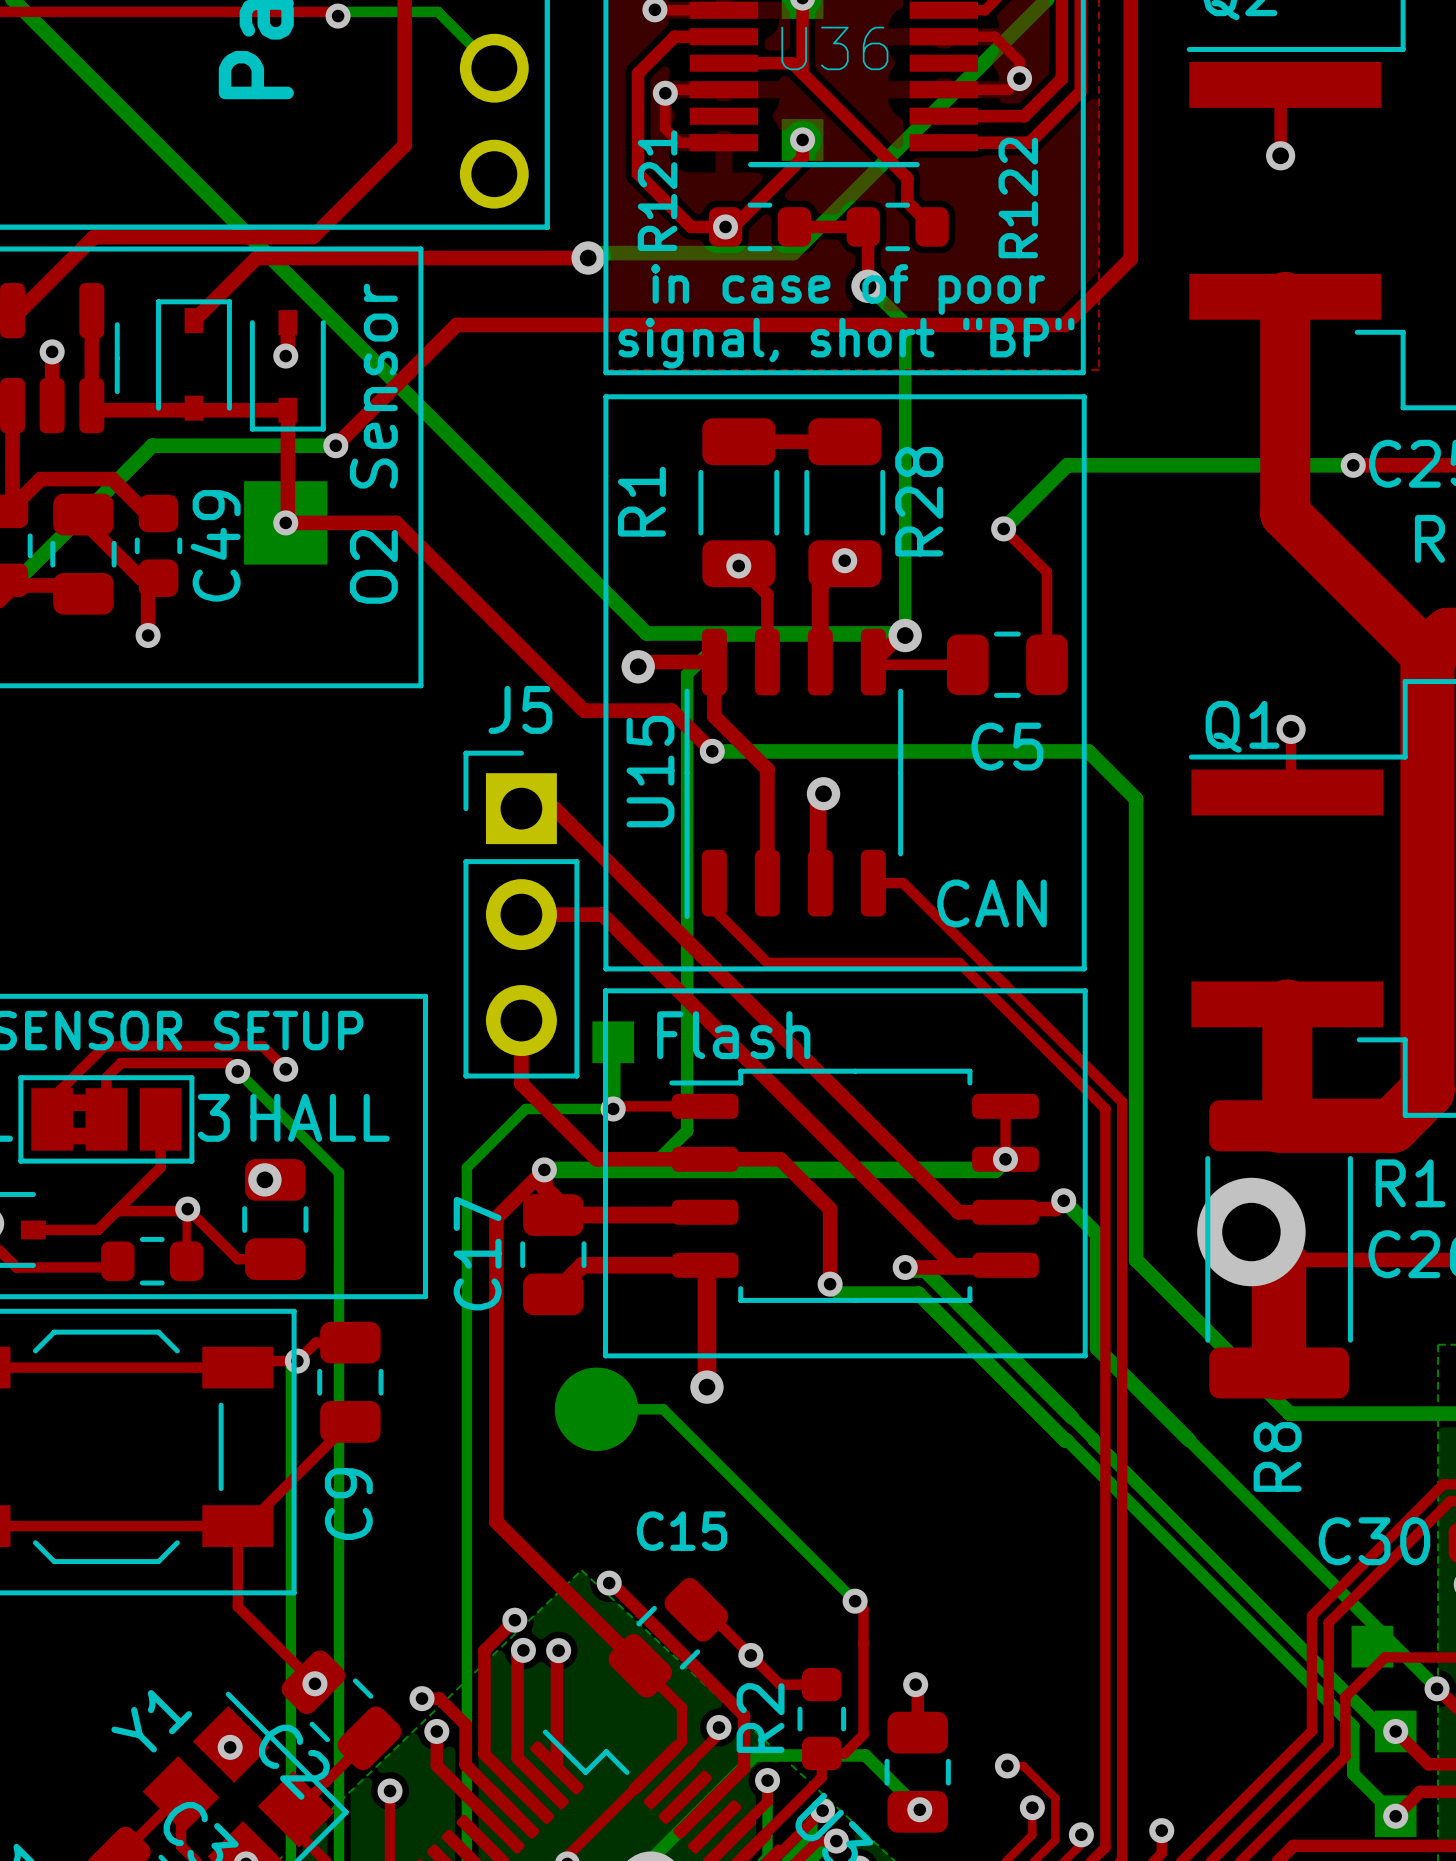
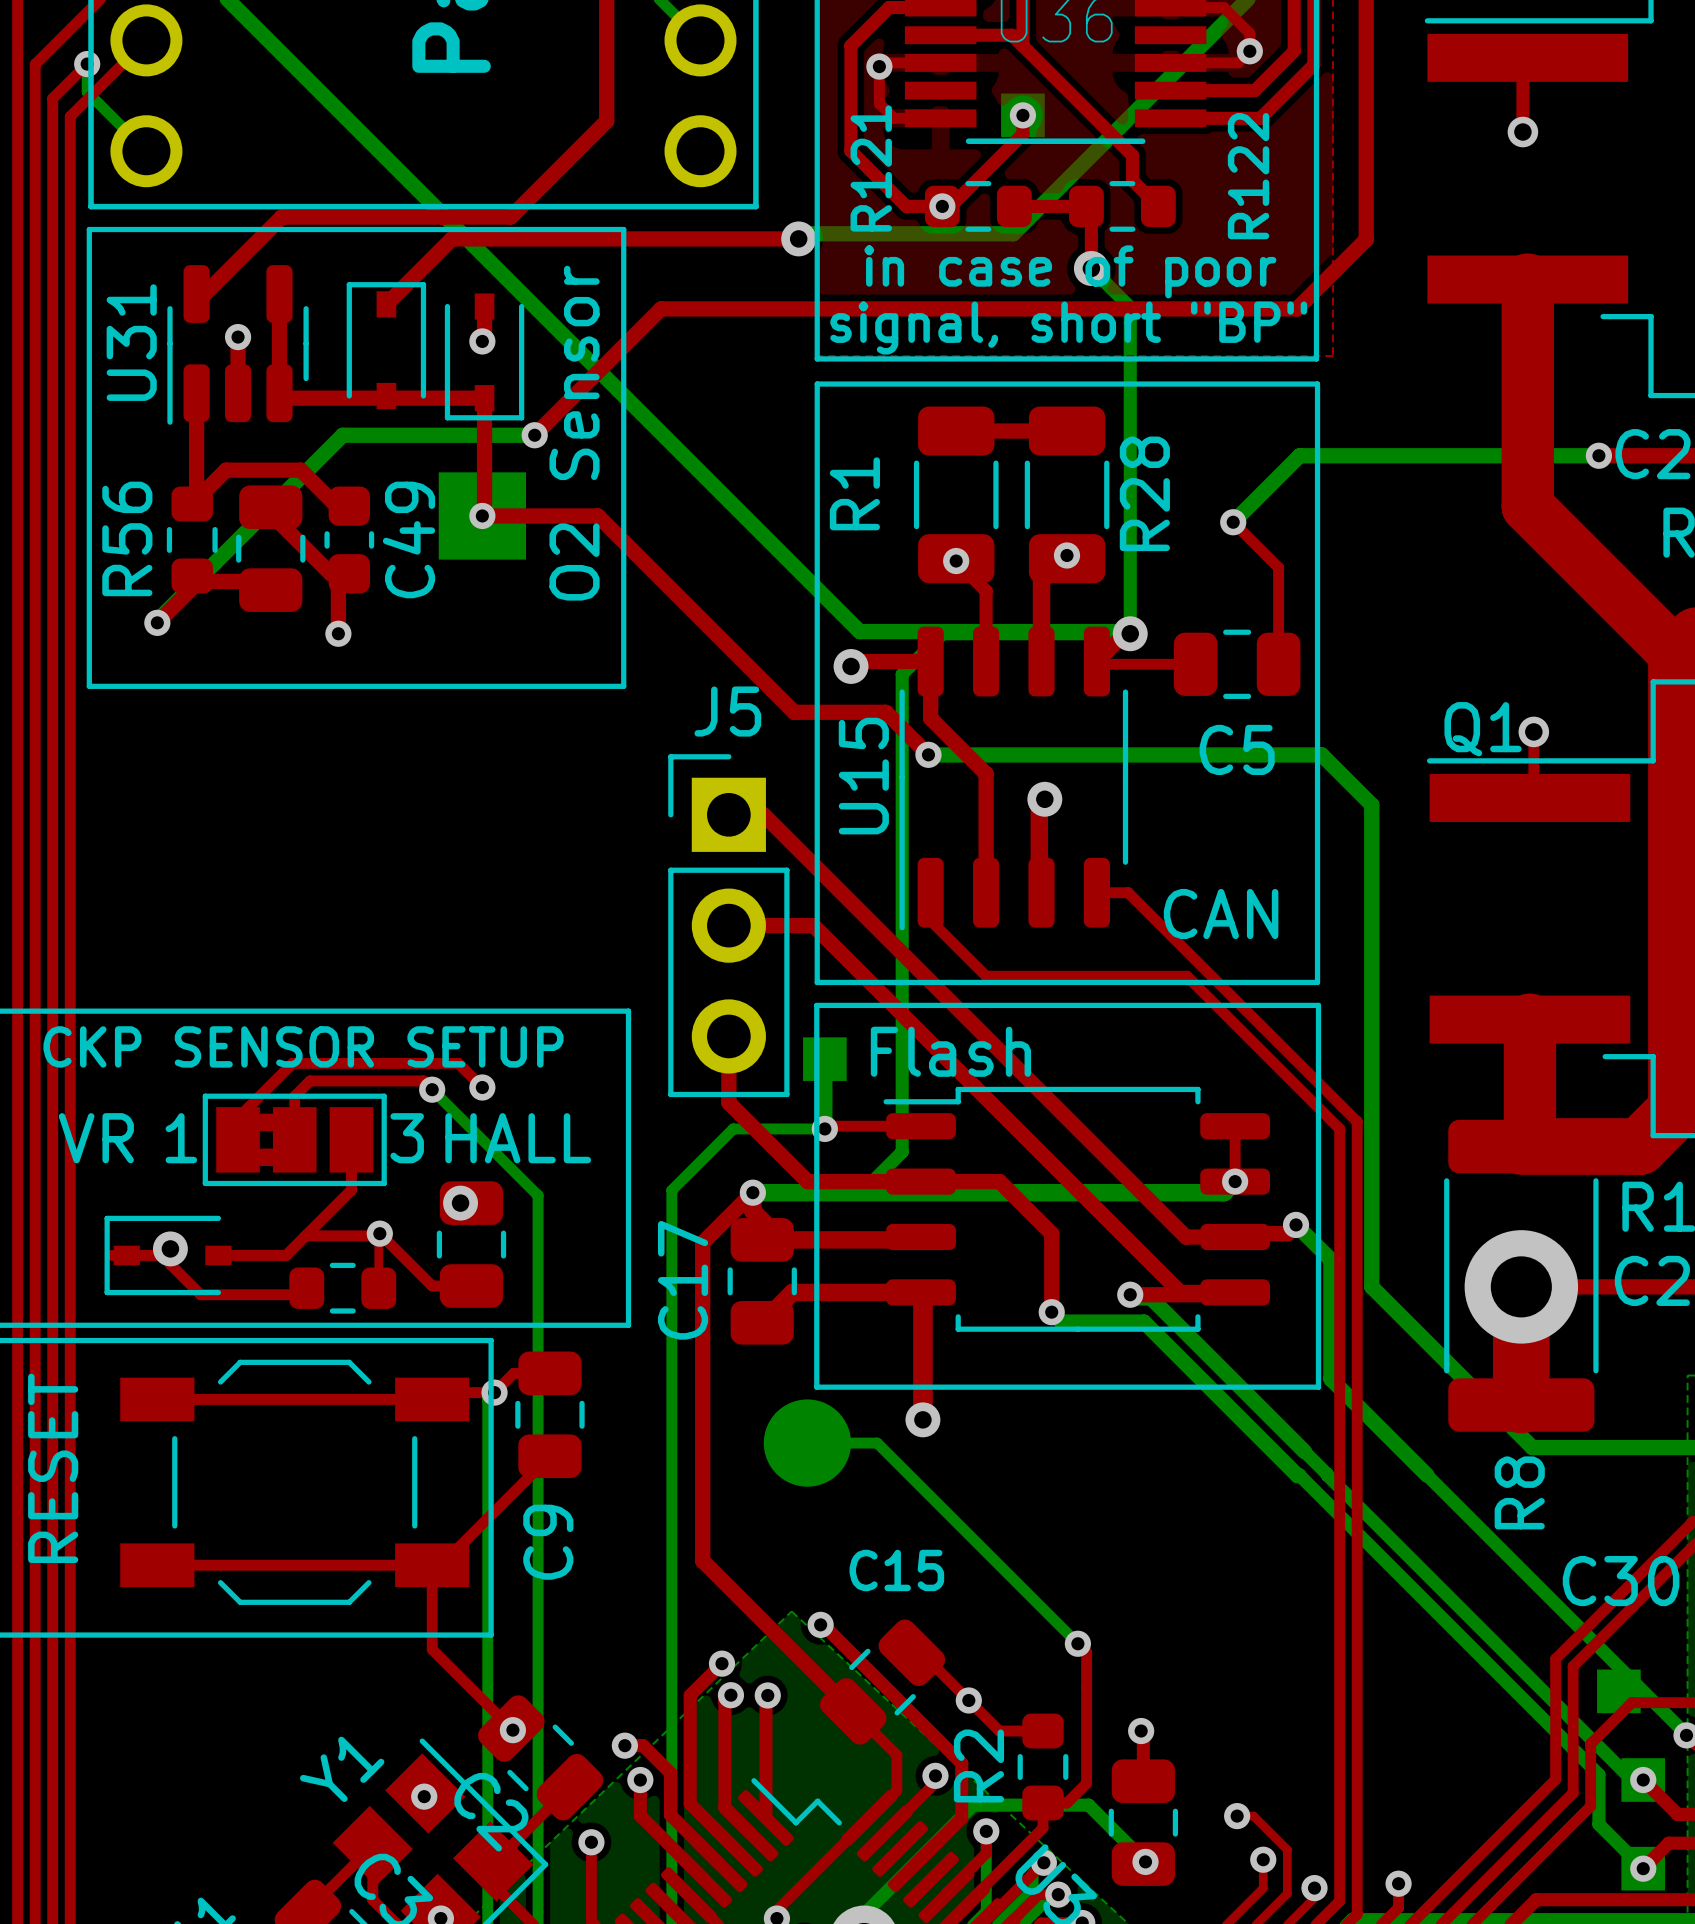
via position: (1251, 1232) -> (1521, 1286)

